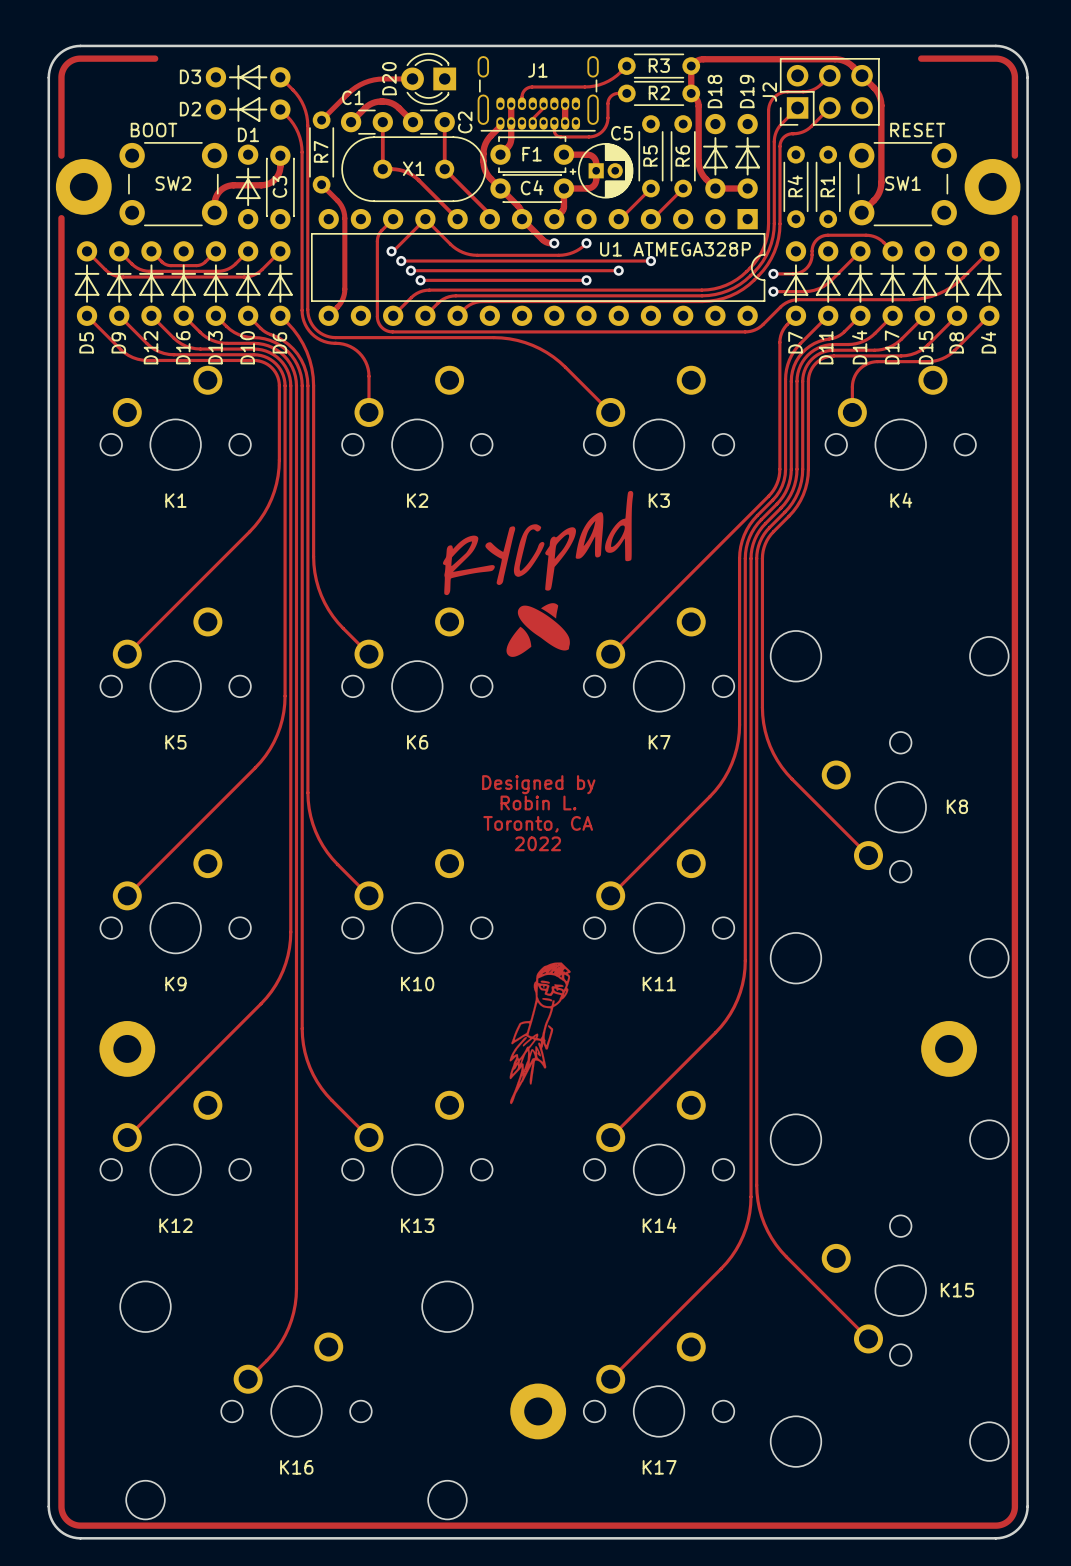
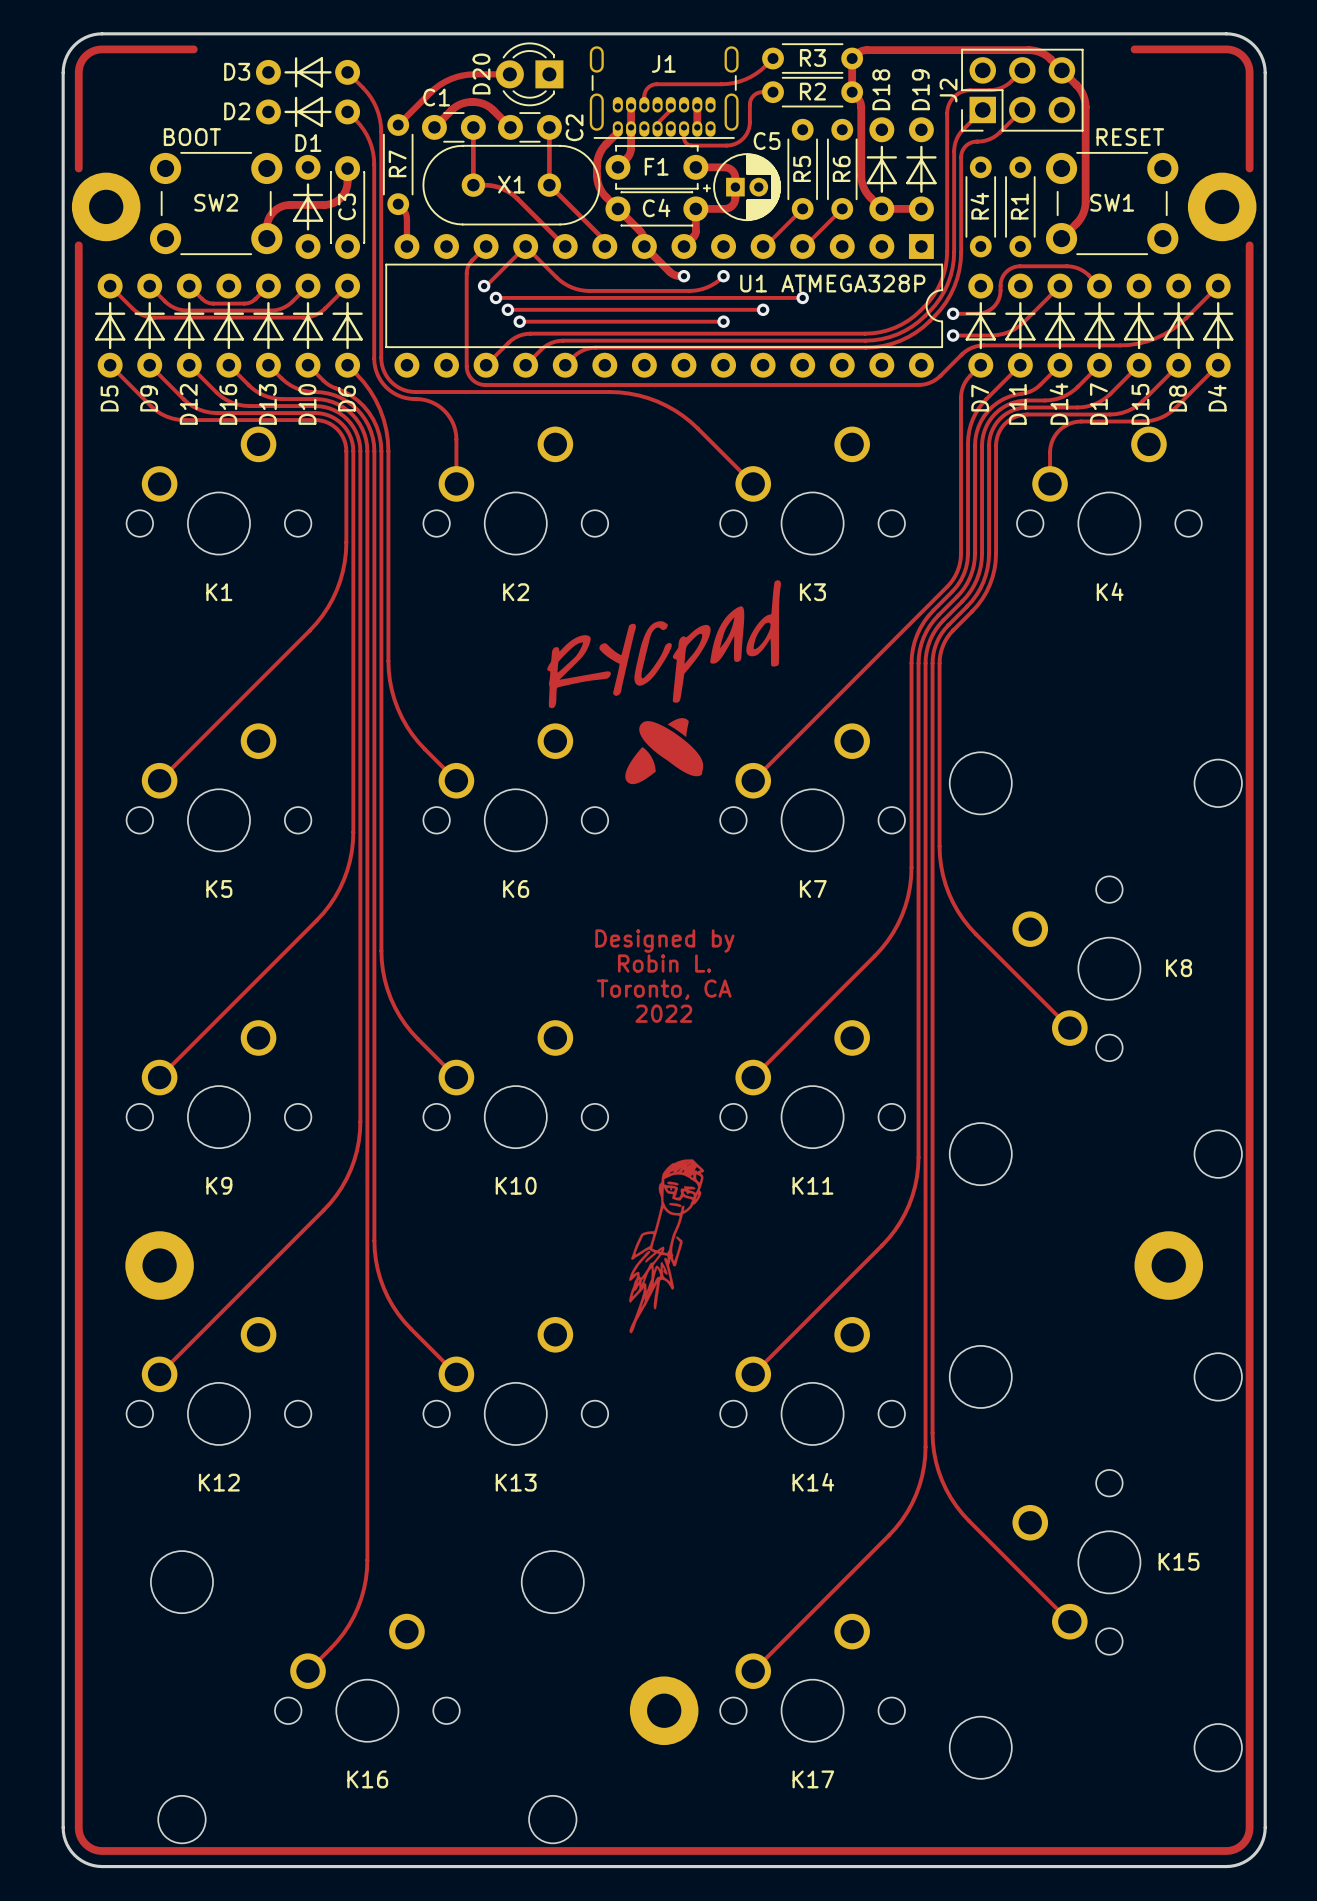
track: (325, 188) (341, 205) (344, 218) (344, 294) (340, 303) (328, 315) -> (402, 208) (406, 217) (406, 246)

